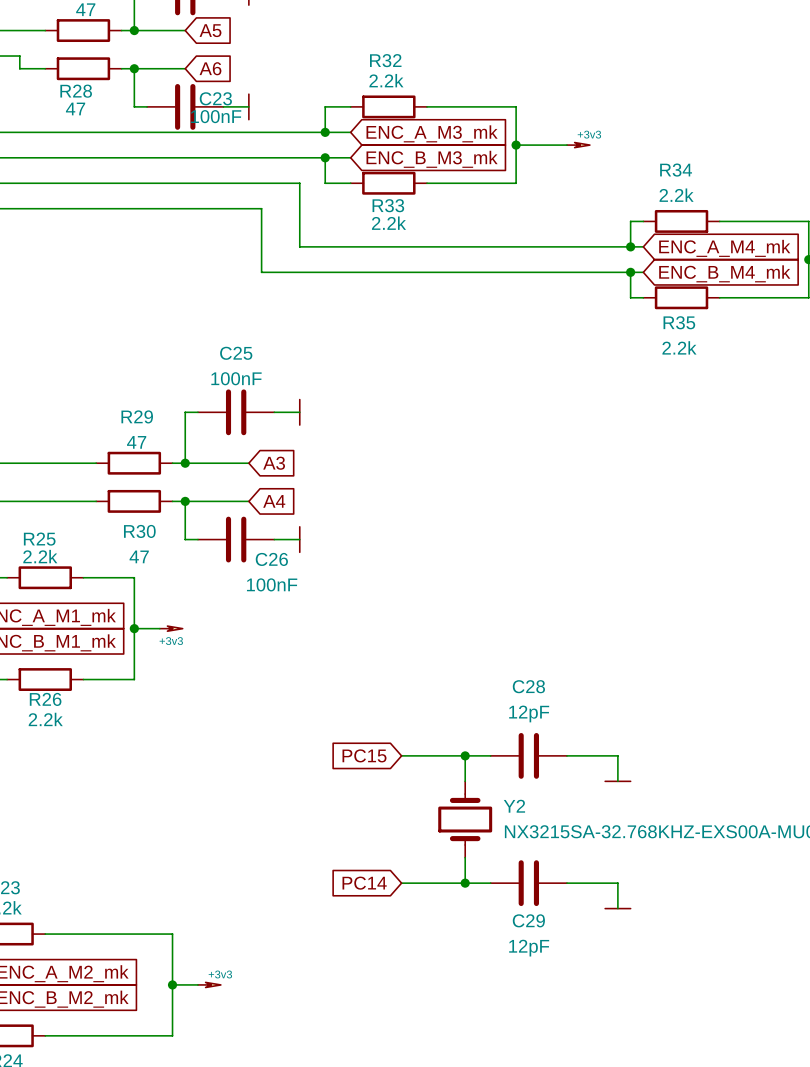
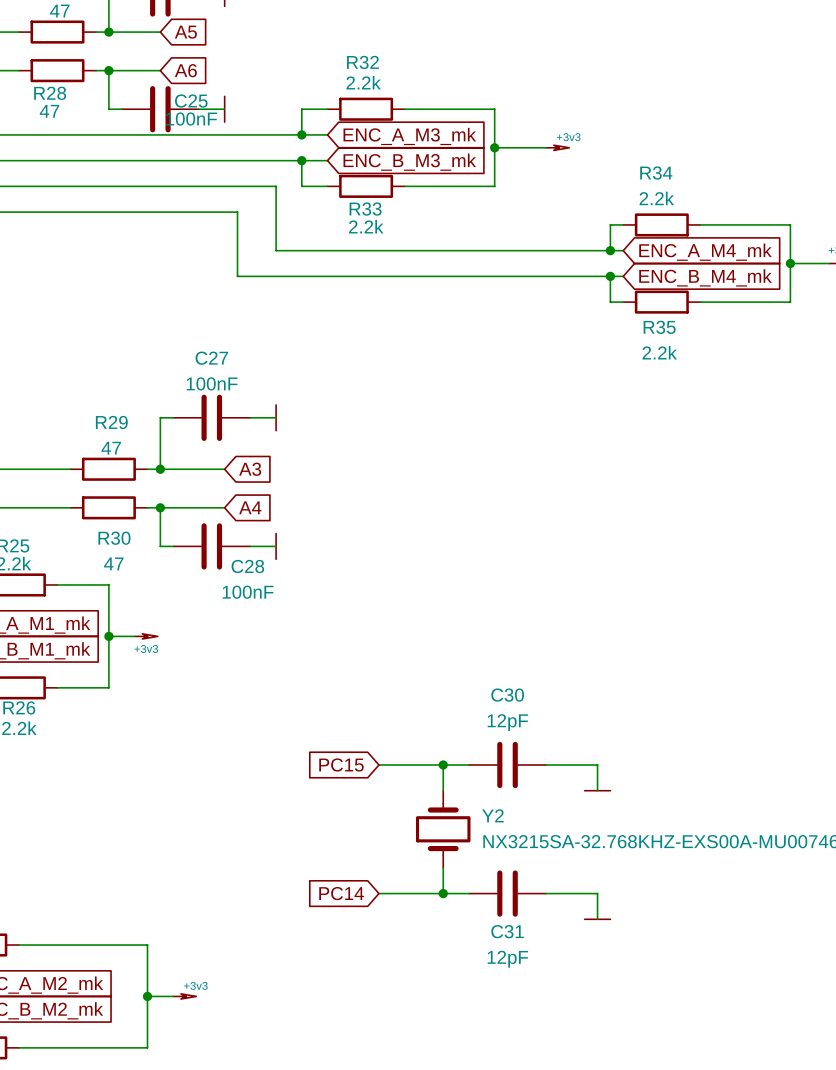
C23 name: C23 (215, 98) -> C25 (191, 101)
C25 name: C25 (236, 353) -> C27 (211, 358)
C26 name: C26 (271, 559) -> C28 (247, 566)
C28 name: C28 (528, 686) -> C30 (507, 695)
C29 name: C29 (528, 920) -> C31 (507, 931)

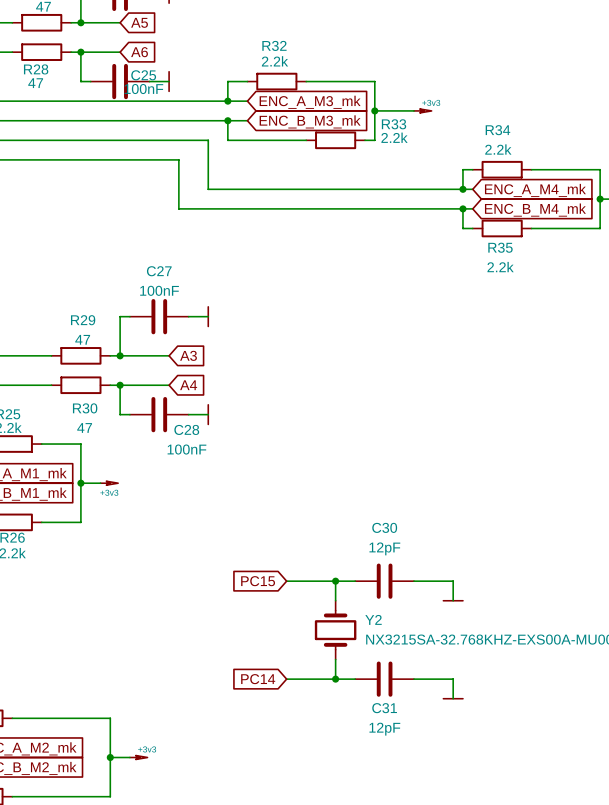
R33 position: (366, 186) -> (335, 140)
wire: (404, 186) (481, 186) -> (306, 140) (247, 140)
R33 name position: R33 (365, 209) -> R33 (394, 124)
R33 value position: 2.2k (366, 226) -> 2.2k (394, 137)

